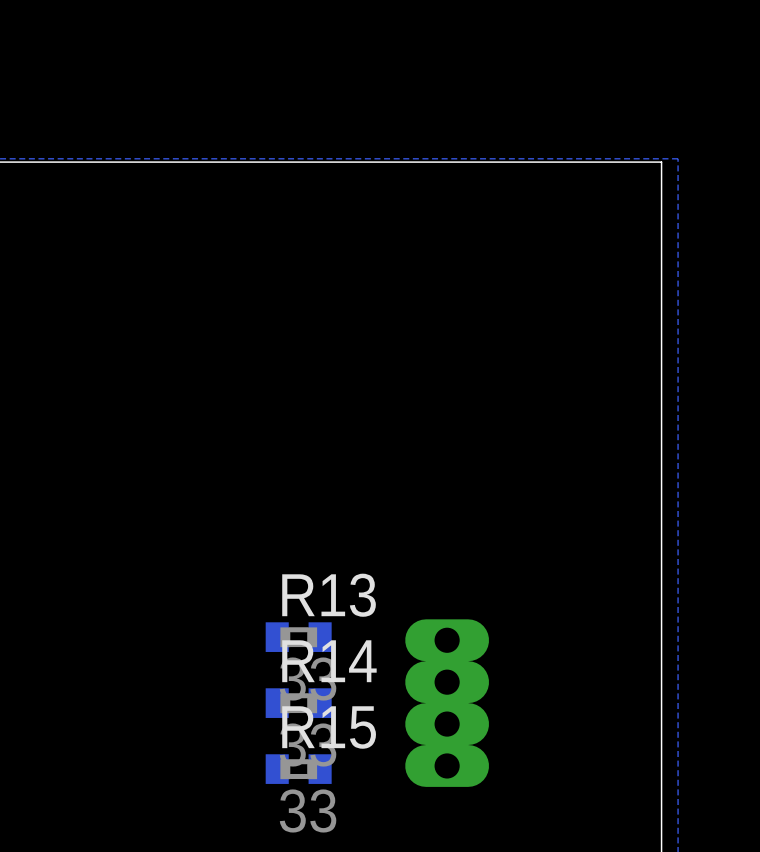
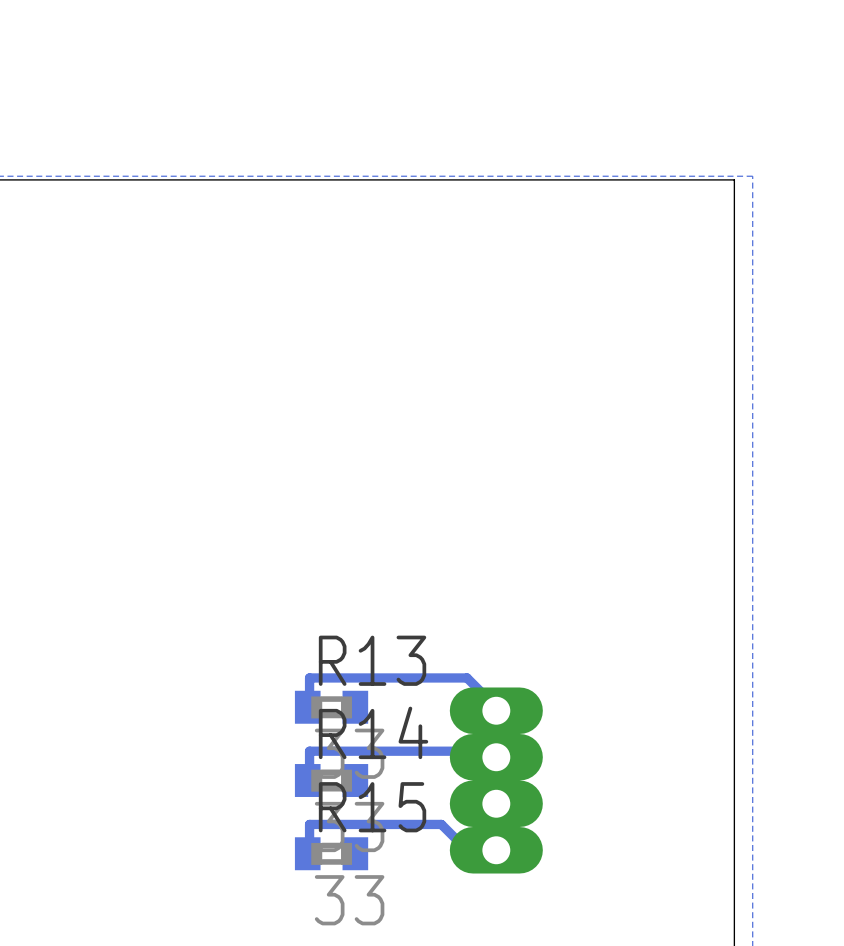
track: none -> (307, 707) (309, 707) (309, 677) (467, 677) (496, 707) (496, 710)
track: none -> (496, 757) (492, 751) (309, 751) (309, 780) (307, 780)
track: none -> (496, 850) (467, 850) (441, 824) (309, 824) (309, 853) (307, 853)

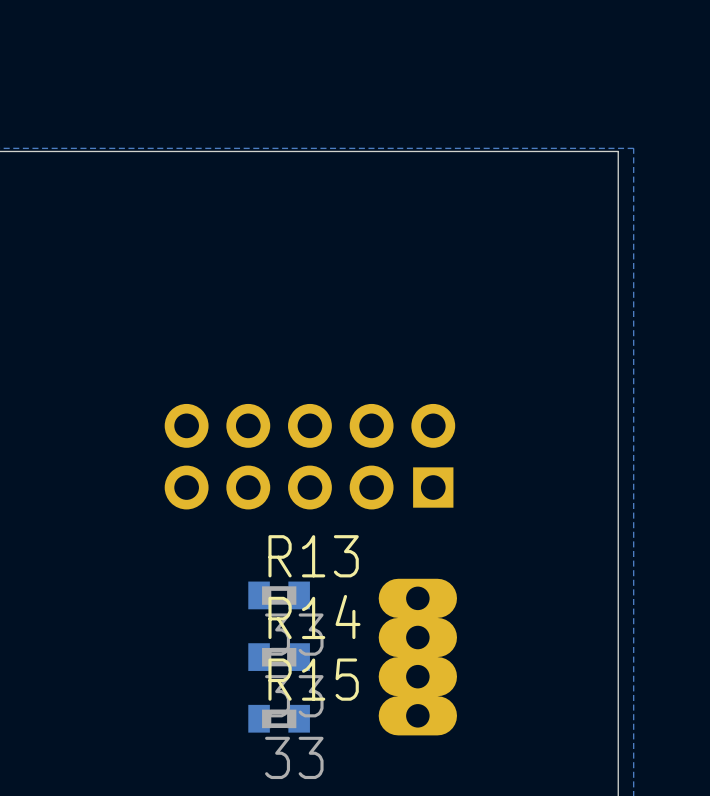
part: none -> (309, 456)
track: (307, 707) (309, 707) (309, 677) (467, 677) (496, 707) (496, 710) -> none
track: (496, 757) (492, 751) (309, 751) (309, 780) (307, 780) -> none
track: (496, 850) (467, 850) (441, 824) (309, 824) (309, 853) (307, 853) -> none

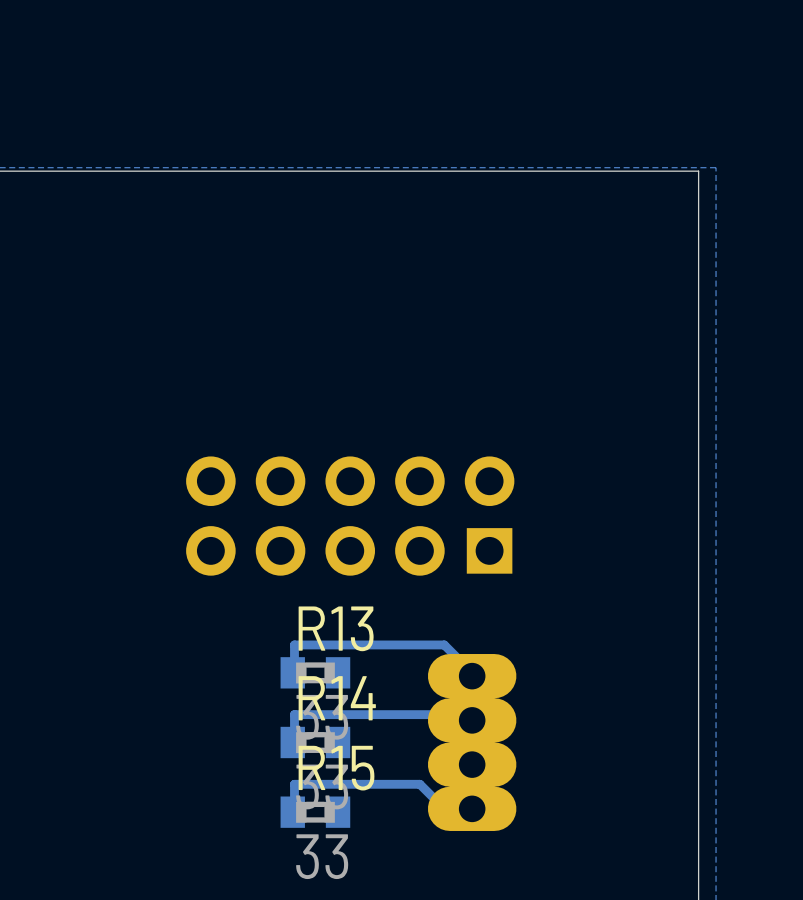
track: none -> (292, 672) (294, 672) (294, 644) (444, 644) (472, 672) (472, 676)
track: none -> (472, 720) (468, 714) (294, 714) (294, 742) (292, 742)
track: none -> (472, 808) (444, 808) (419, 784) (294, 784) (294, 812) (292, 812)

